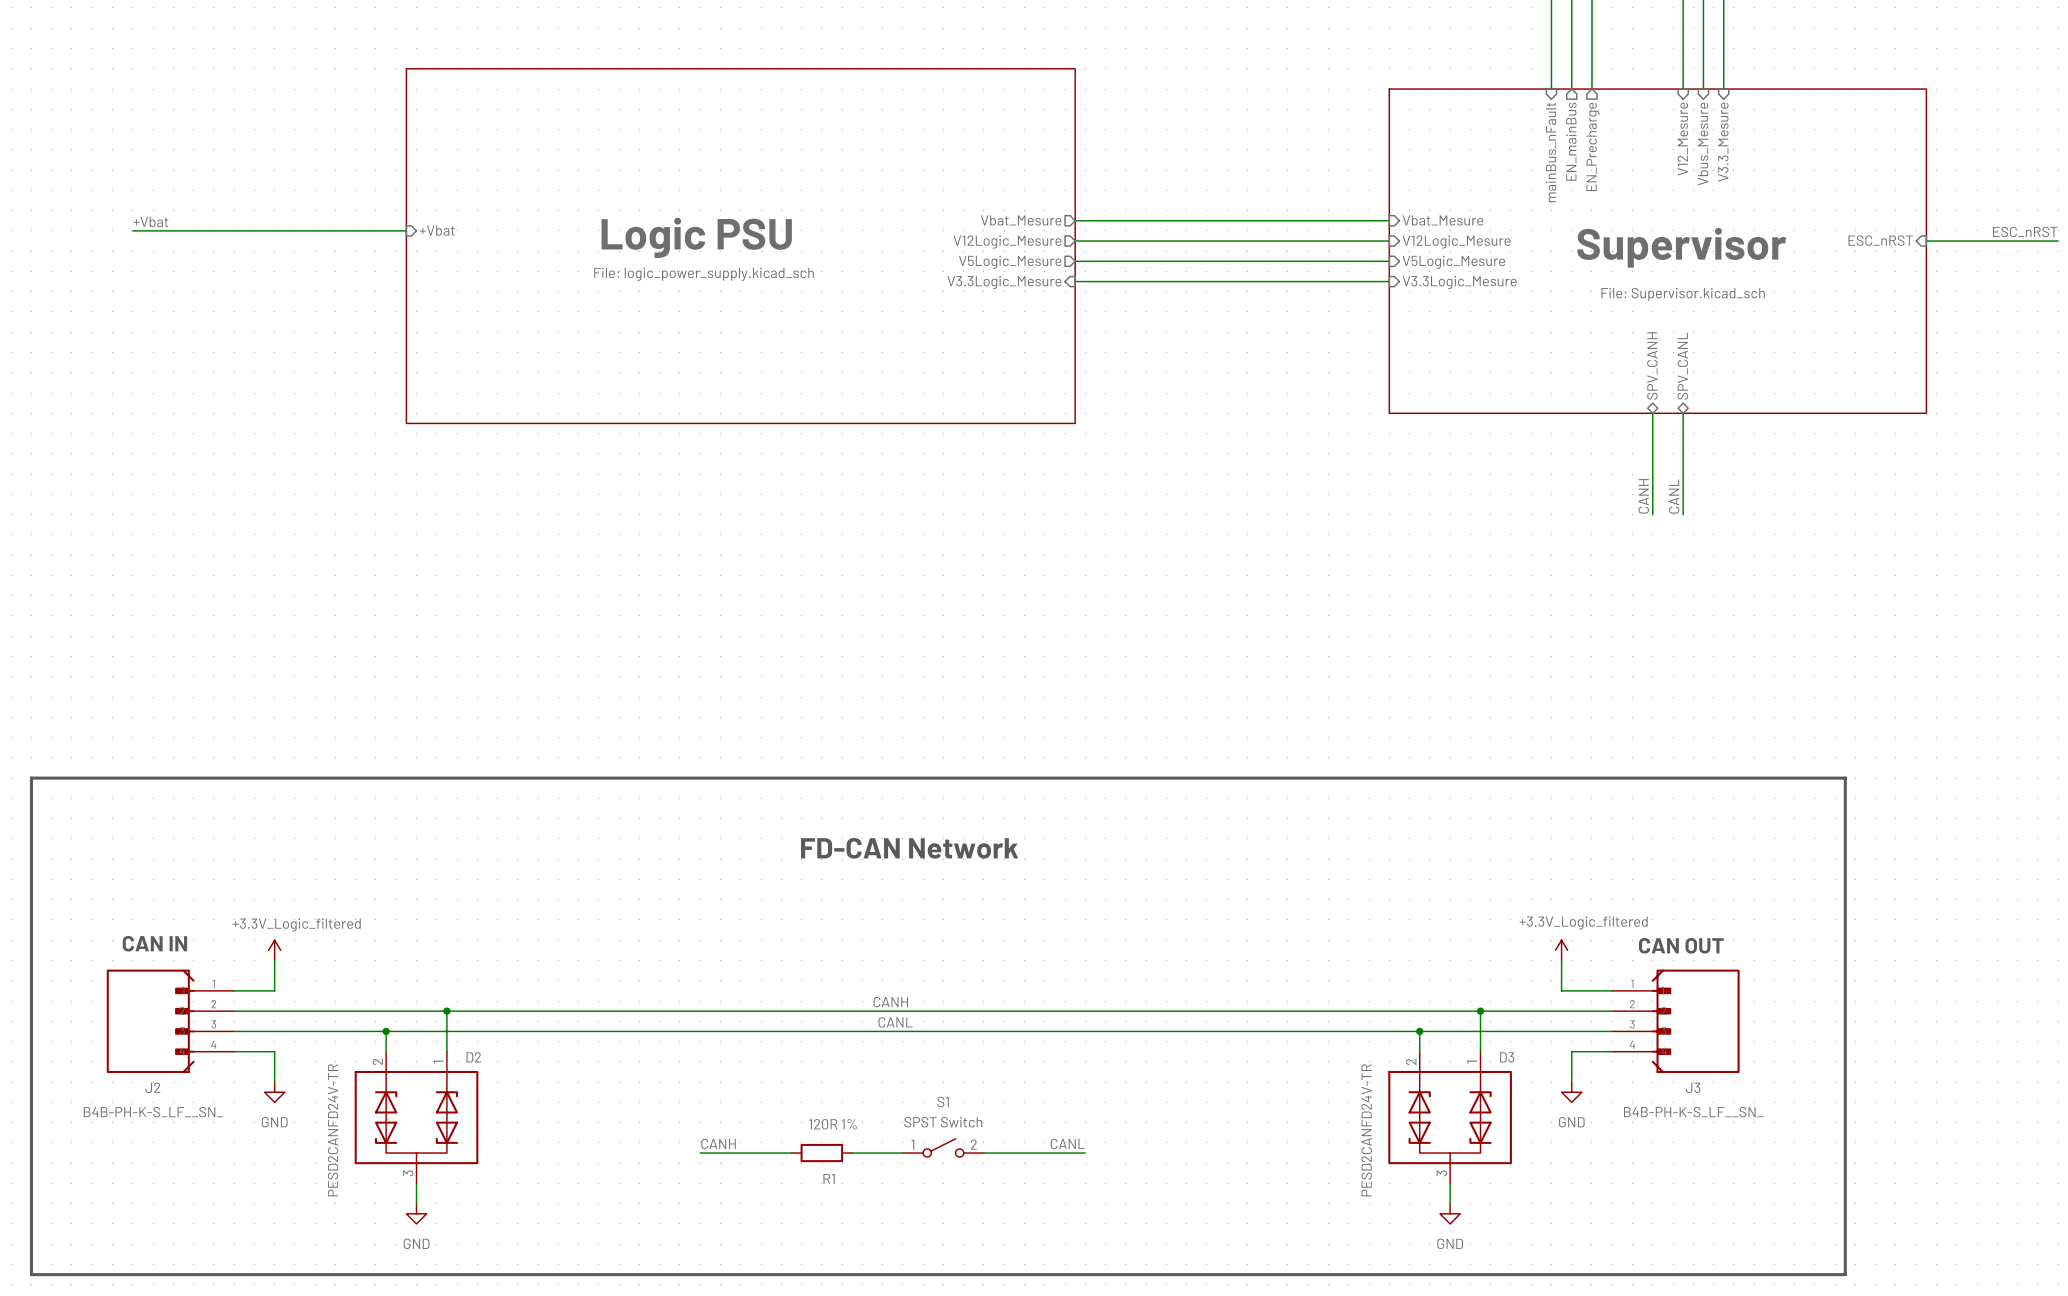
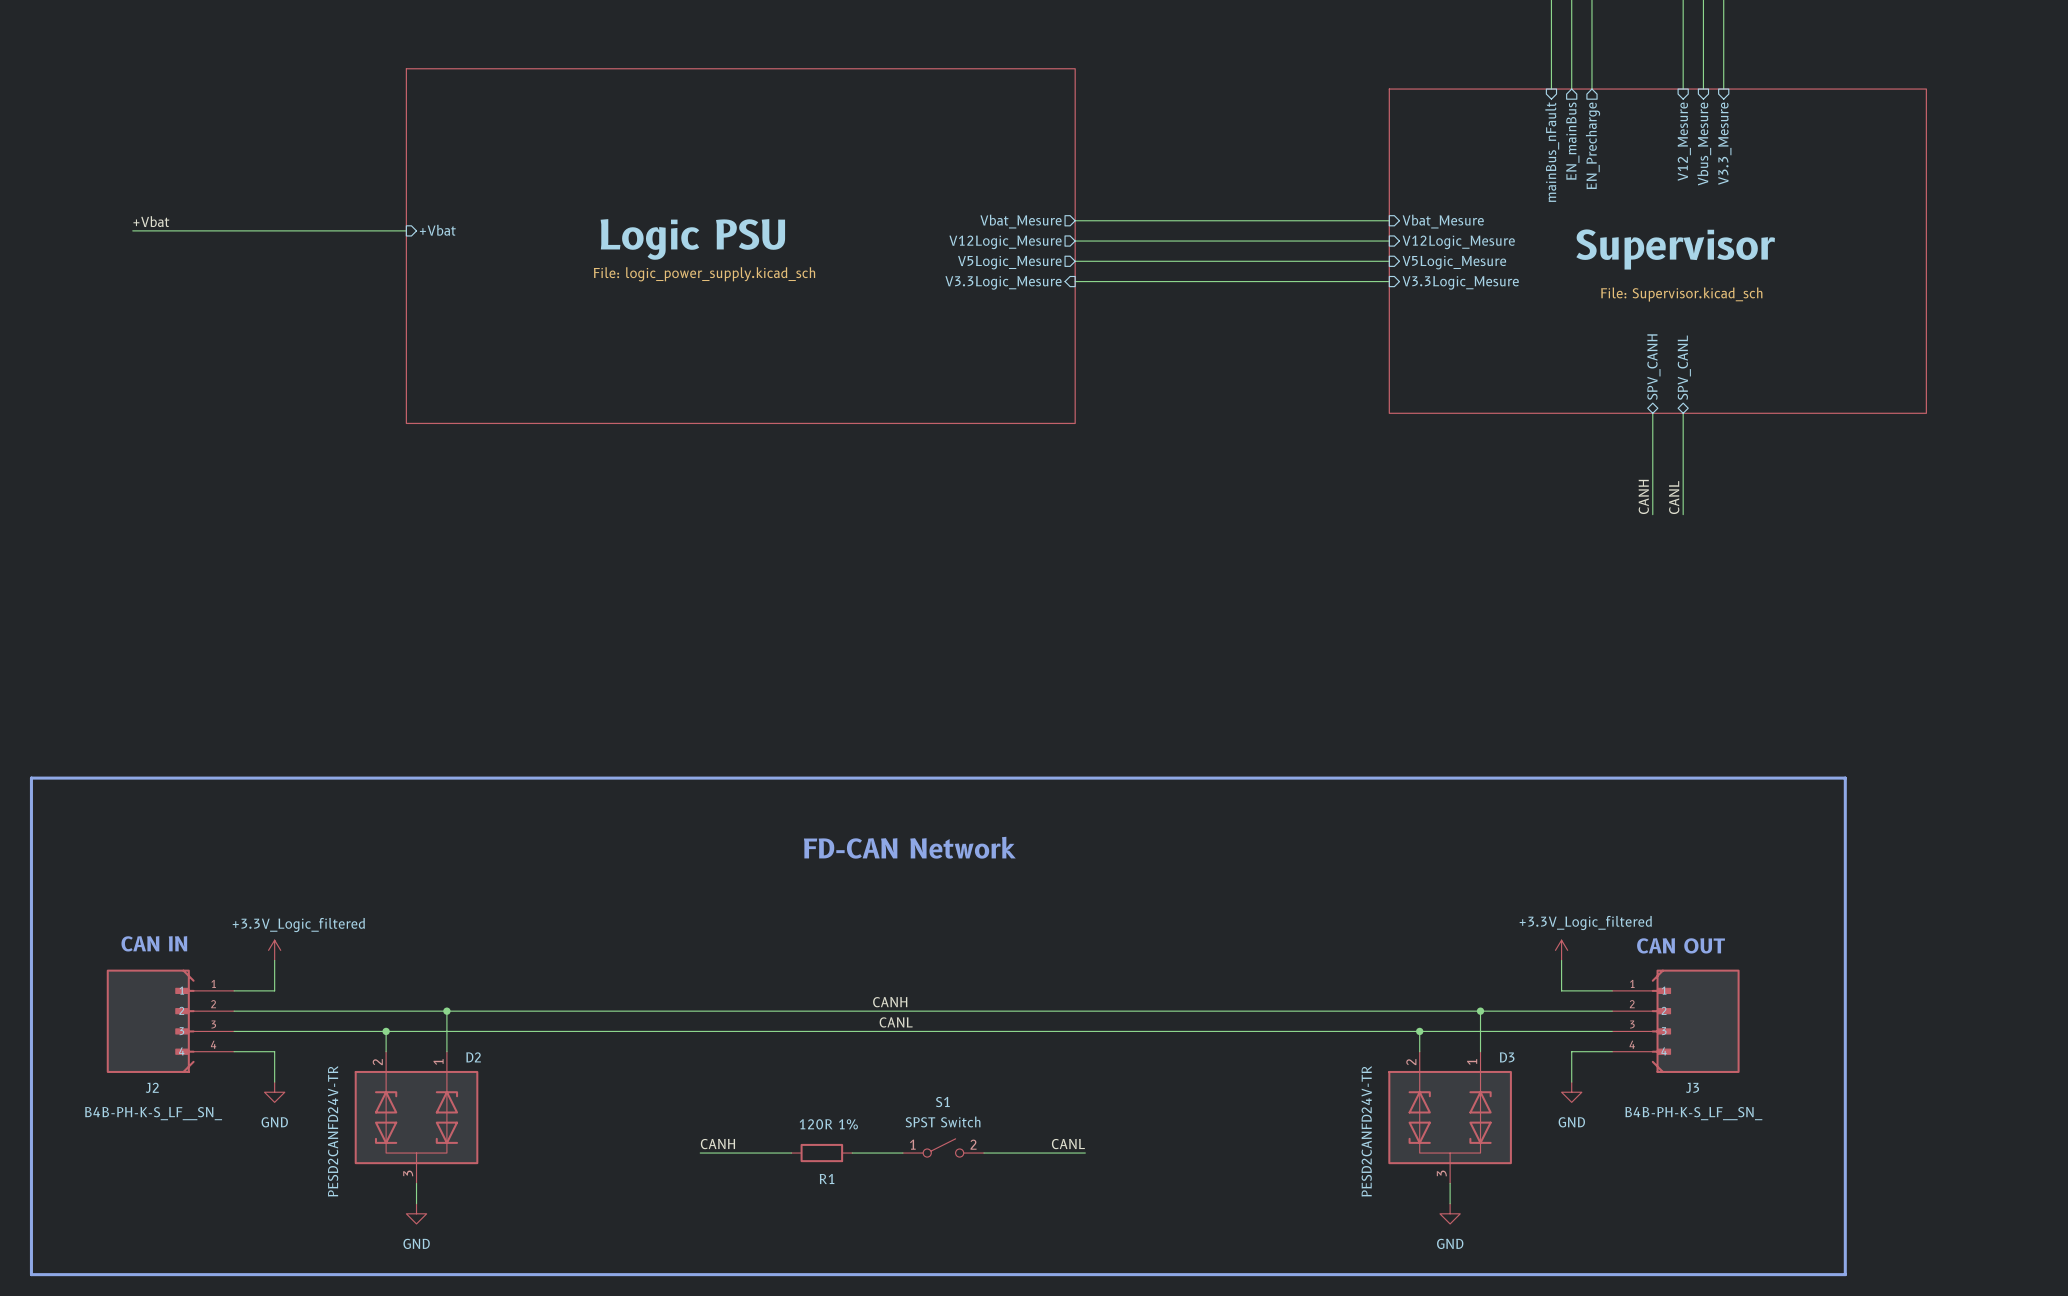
label: ESC_nRST (2025, 231) -> none
sheet pin: ESC_nRST (1880, 240) -> none
wire: (1926, 241) (2058, 241) -> none

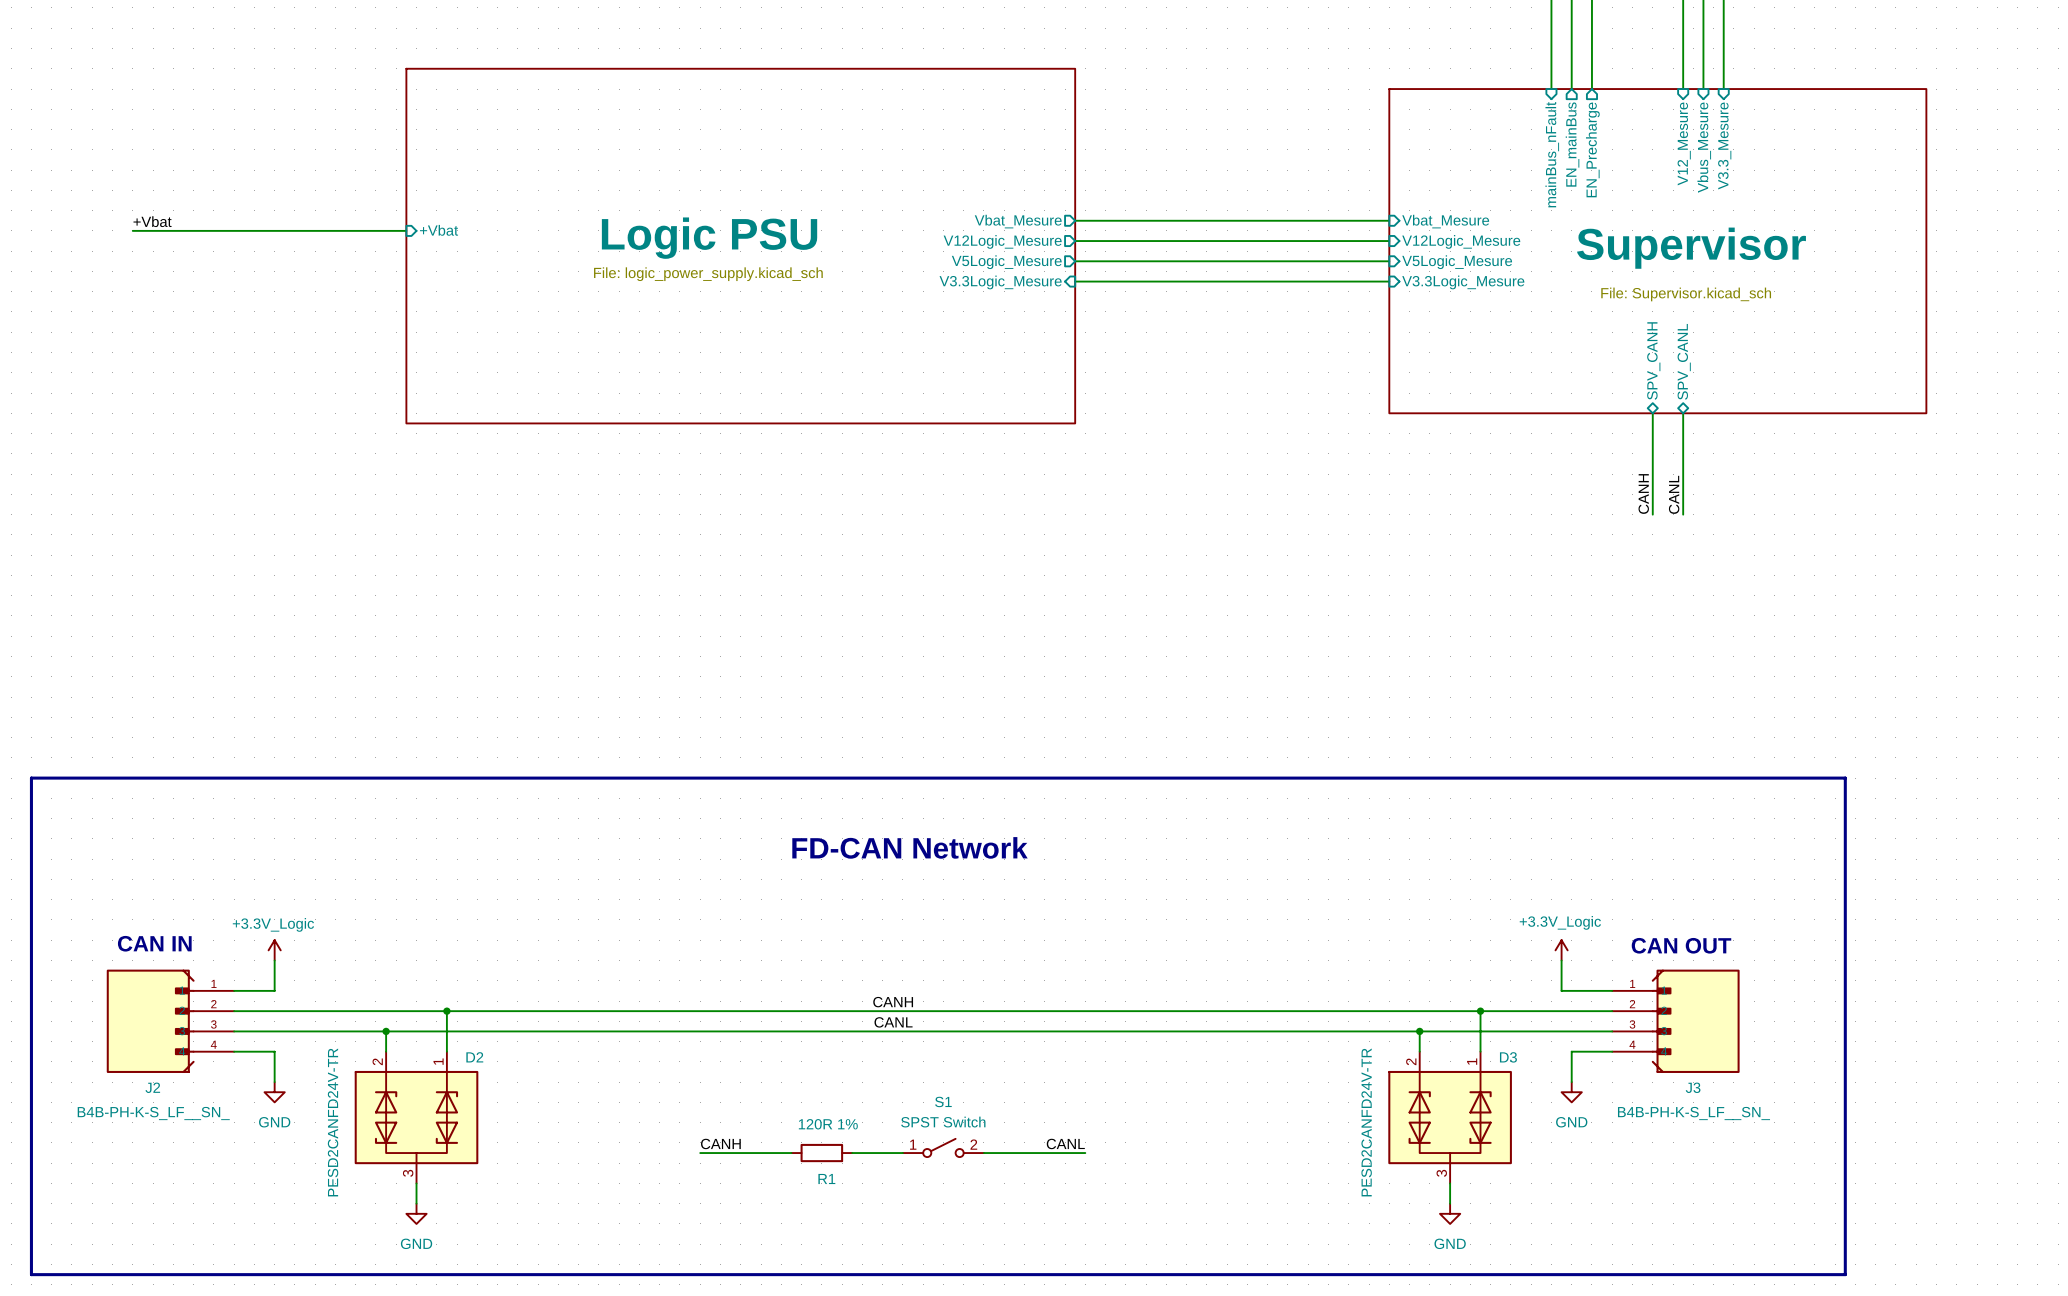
power symbol: +3.3V_Logic_filtered (274, 950) -> +3.3V_Logic (274, 950)
power symbol: +3.3V_Logic_filtered (1561, 950) -> +3.3V_Logic (1561, 950)

